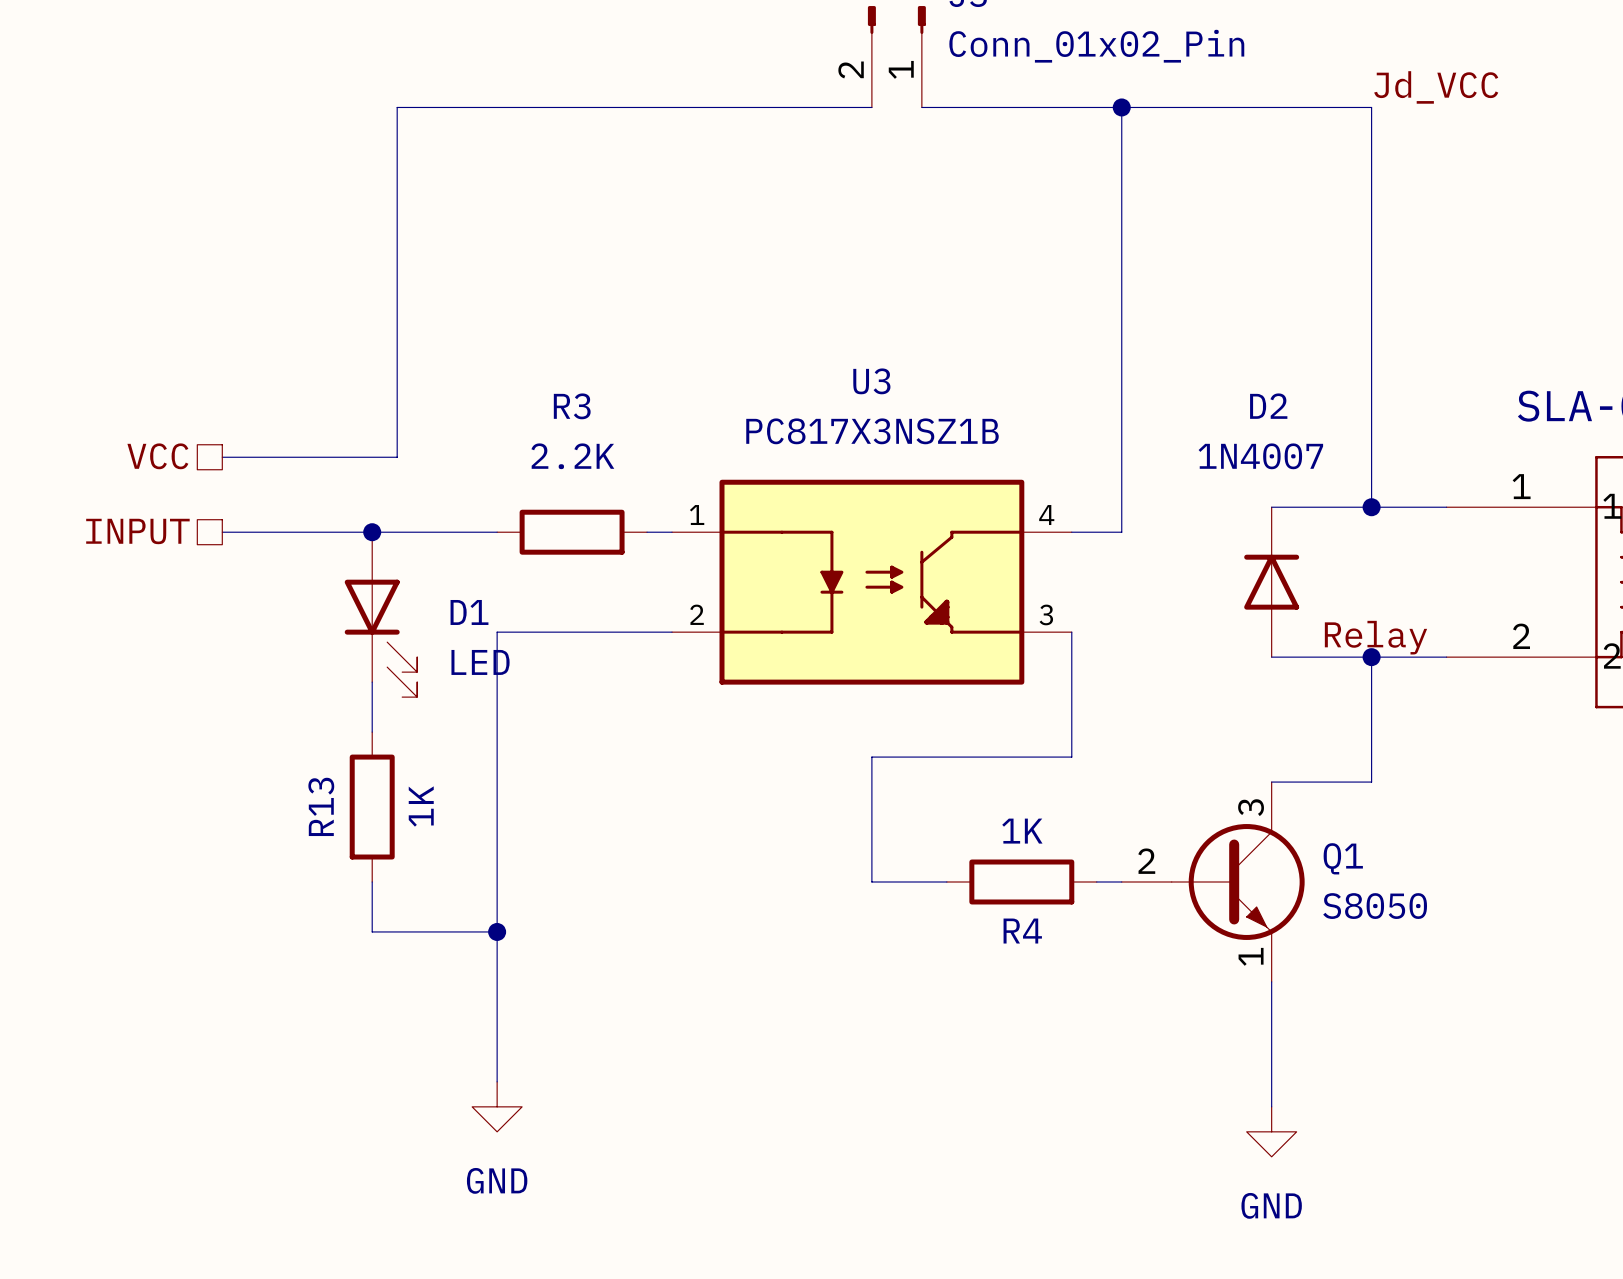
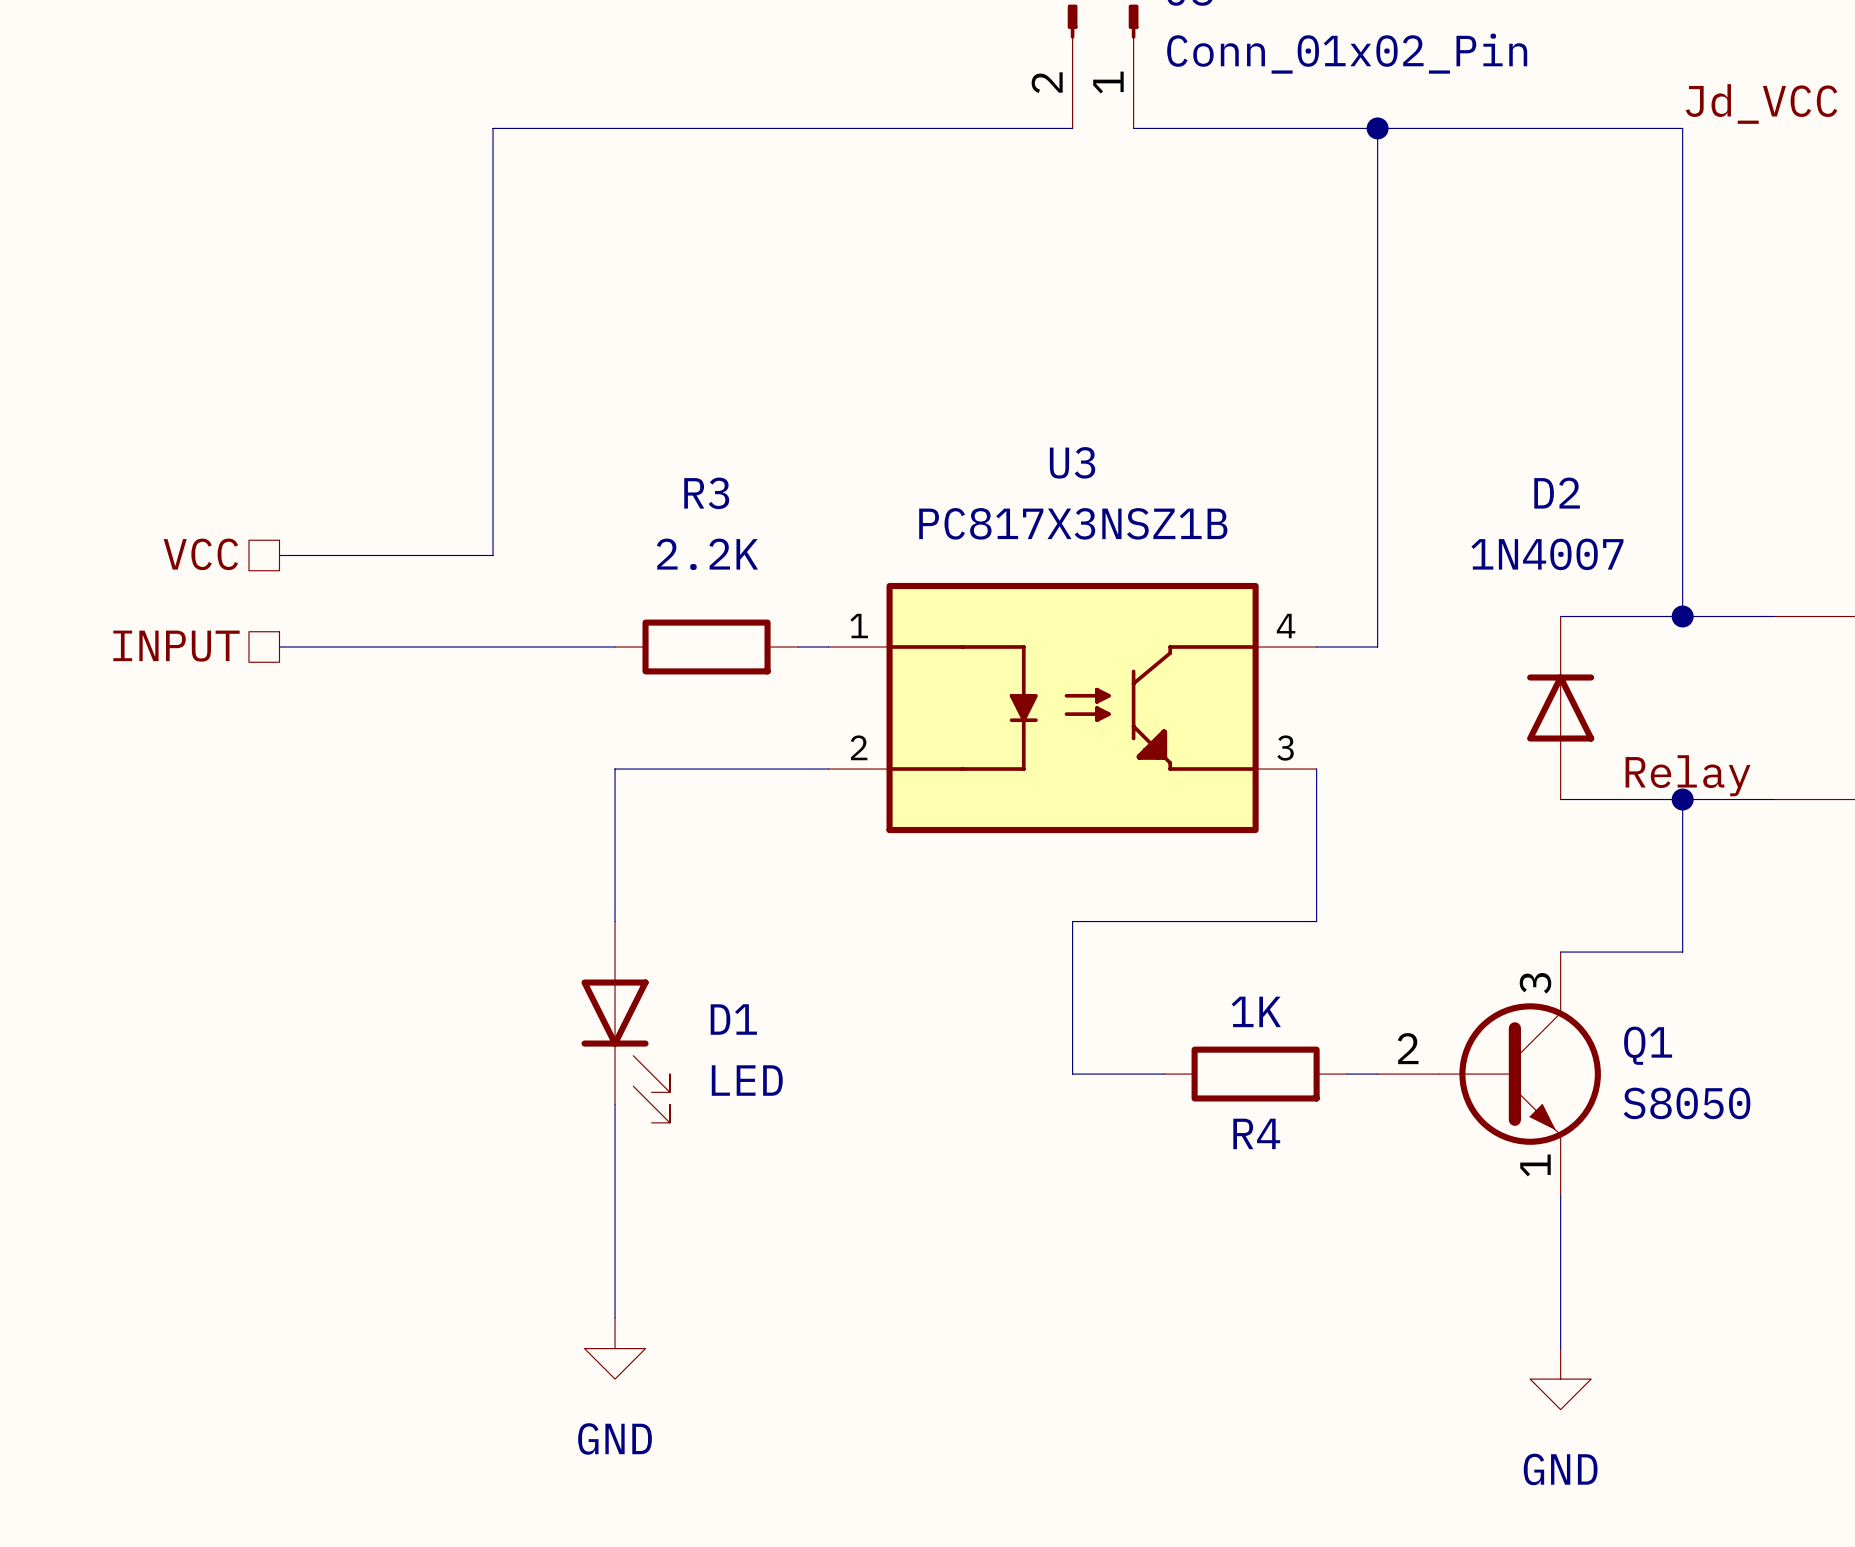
junction: (372, 532) -> none
D1 position: (380, 614) -> (625, 1022)
wire: (372, 682) (372, 732) -> none
R13: 1K (372, 807) -> none
wire: (372, 881) (372, 931) (497, 931) -> none
junction: (497, 931) -> none

